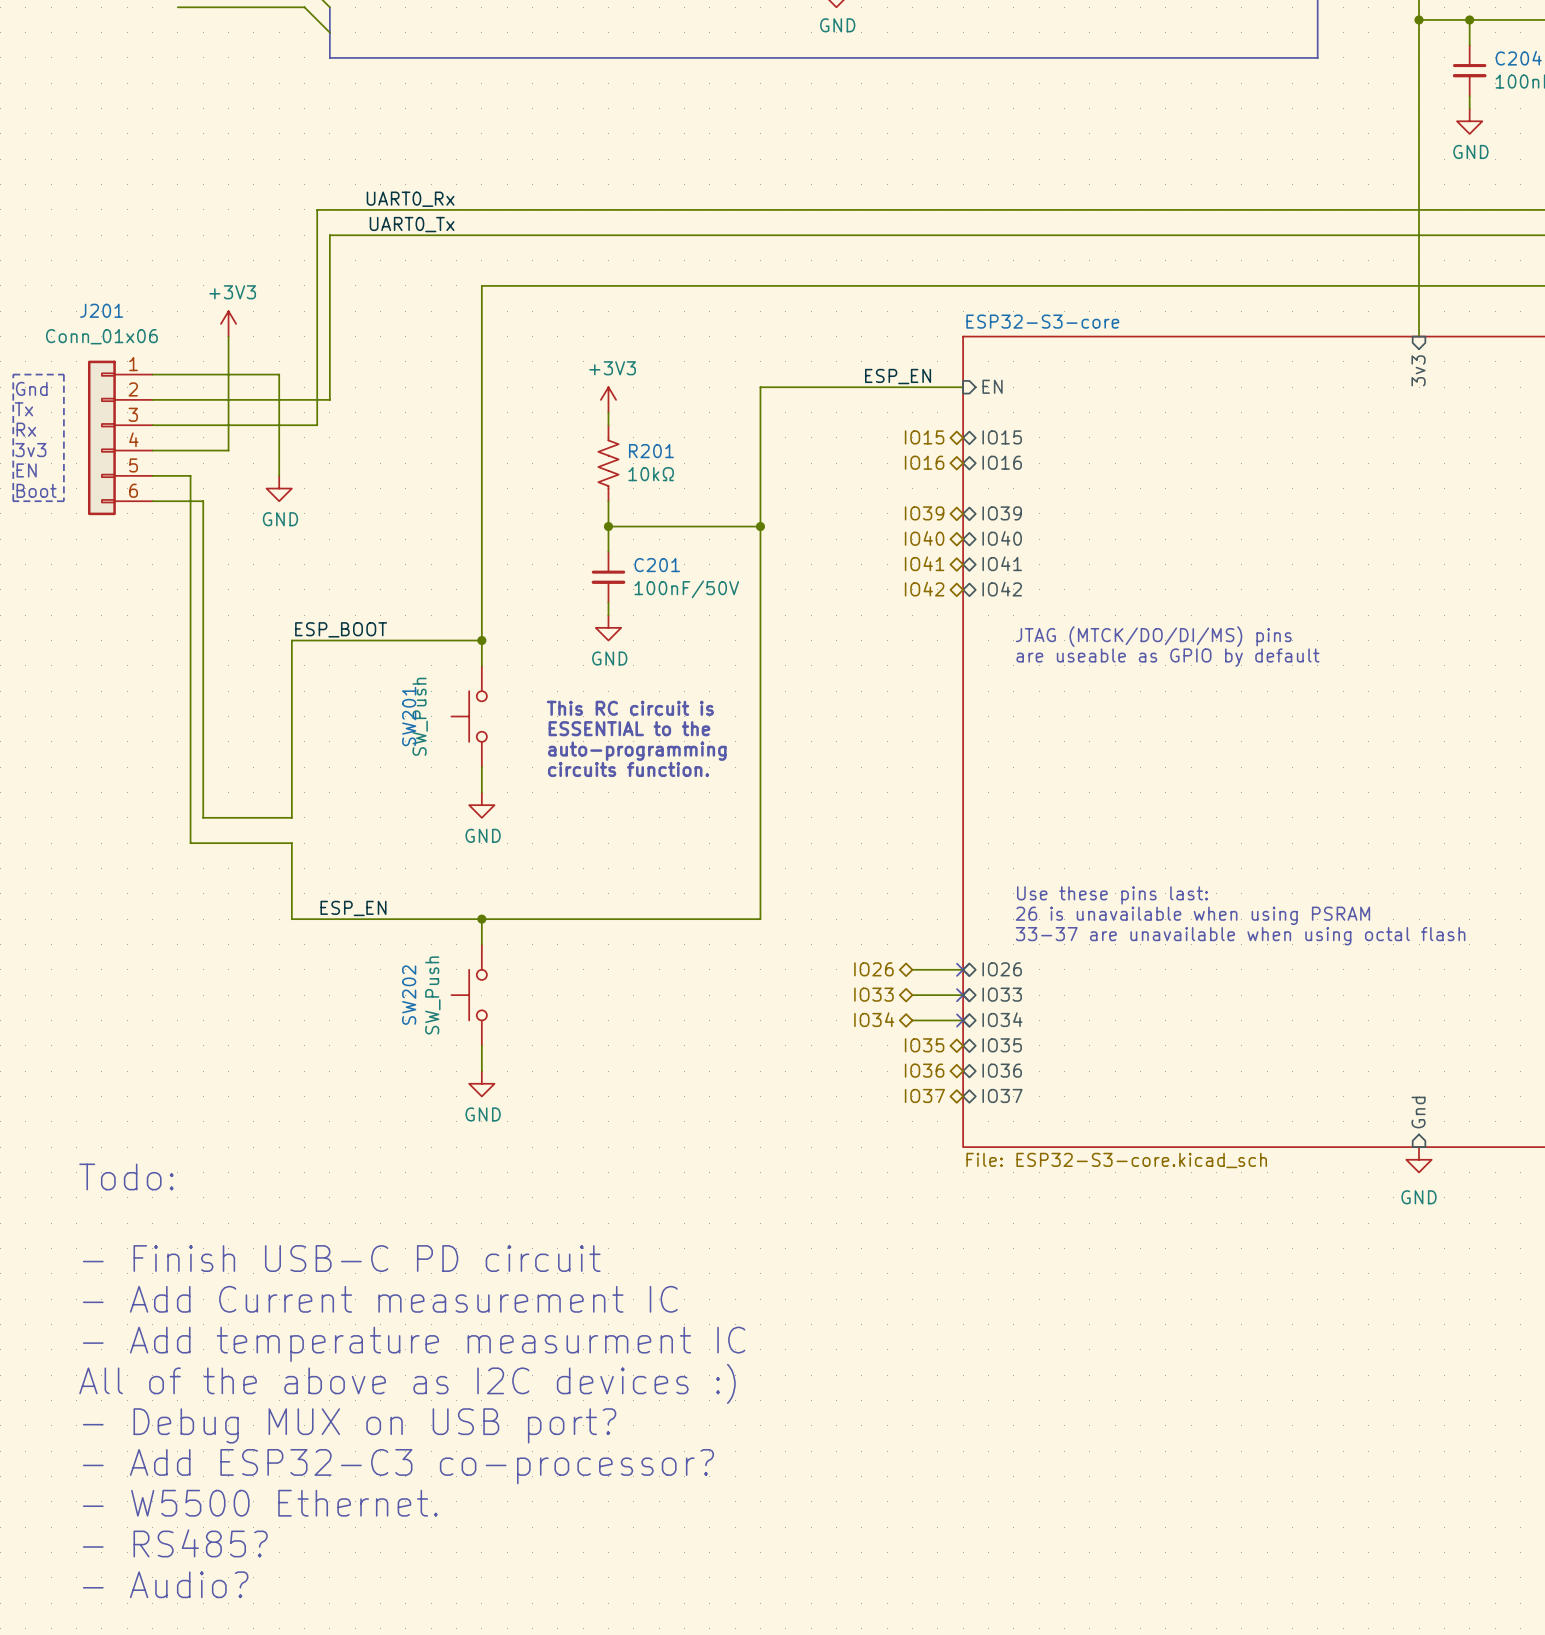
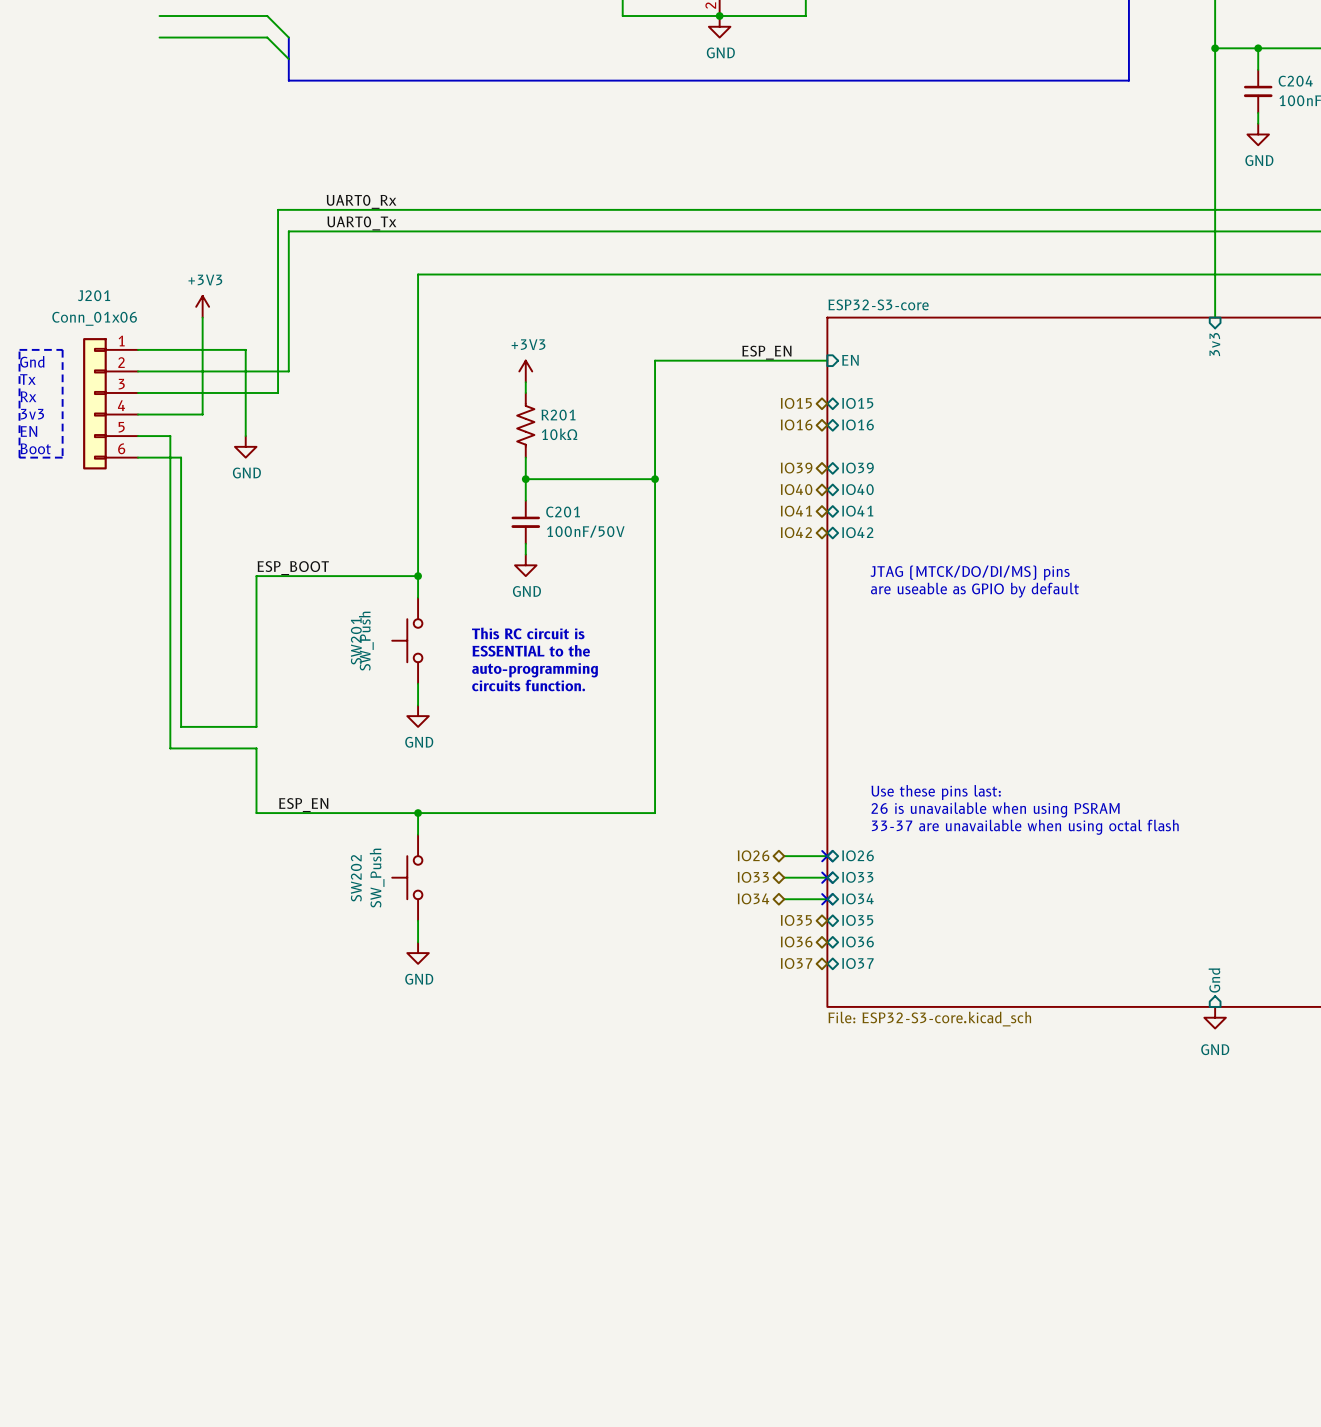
text: Todo: (126, 1176) -> none
text: - Finish USB-C PD circuit (341, 1258) -> none
text: - Add Current measurement IC (380, 1299) -> none
text: - Add temperature measurment IC (414, 1344) -> none
text: All of the above as I2C devices :) (407, 1383) -> none
text: - Debug MUX on USB port? (349, 1425) -> none
text: - Add ESP32-C3 co-processor? (398, 1466) -> none
text: - W5500 Ethernet. (260, 1503) -> none
text: - RS485? (175, 1543) -> none
text: - Audio? (165, 1584) -> none

